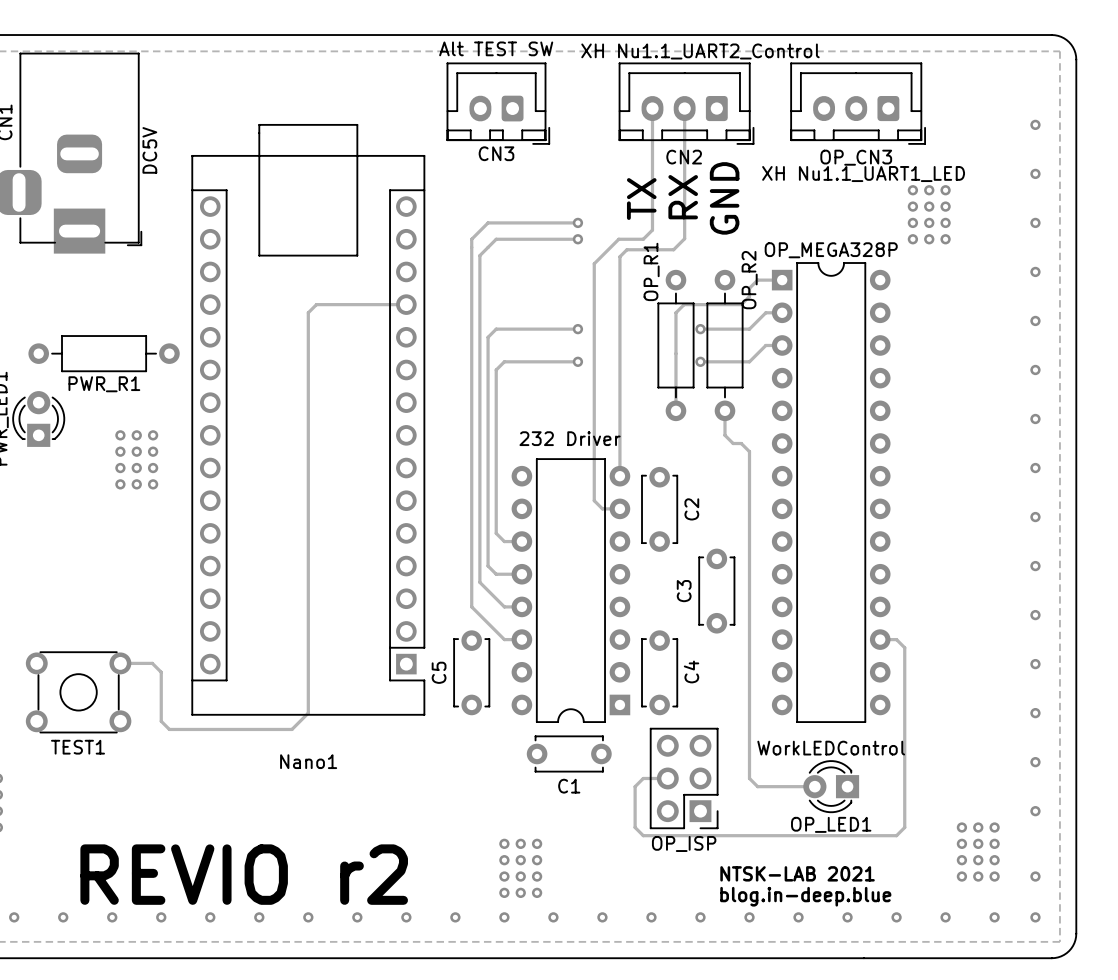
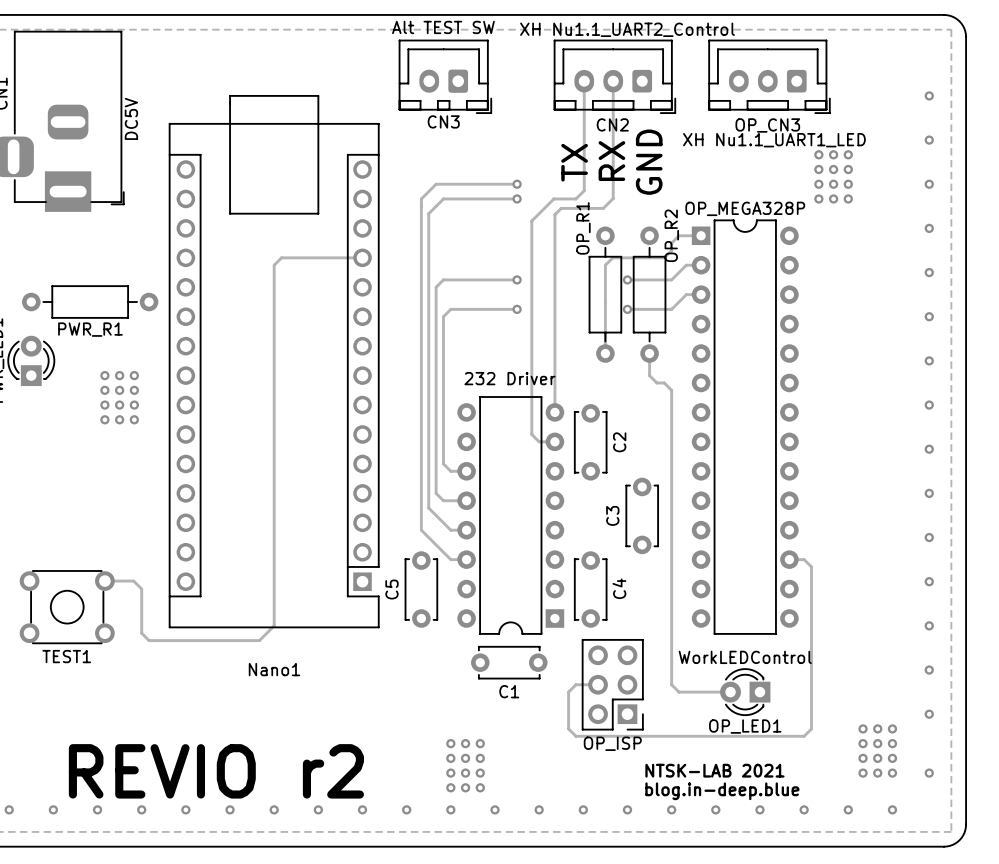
via: (1035, 917) -> none

